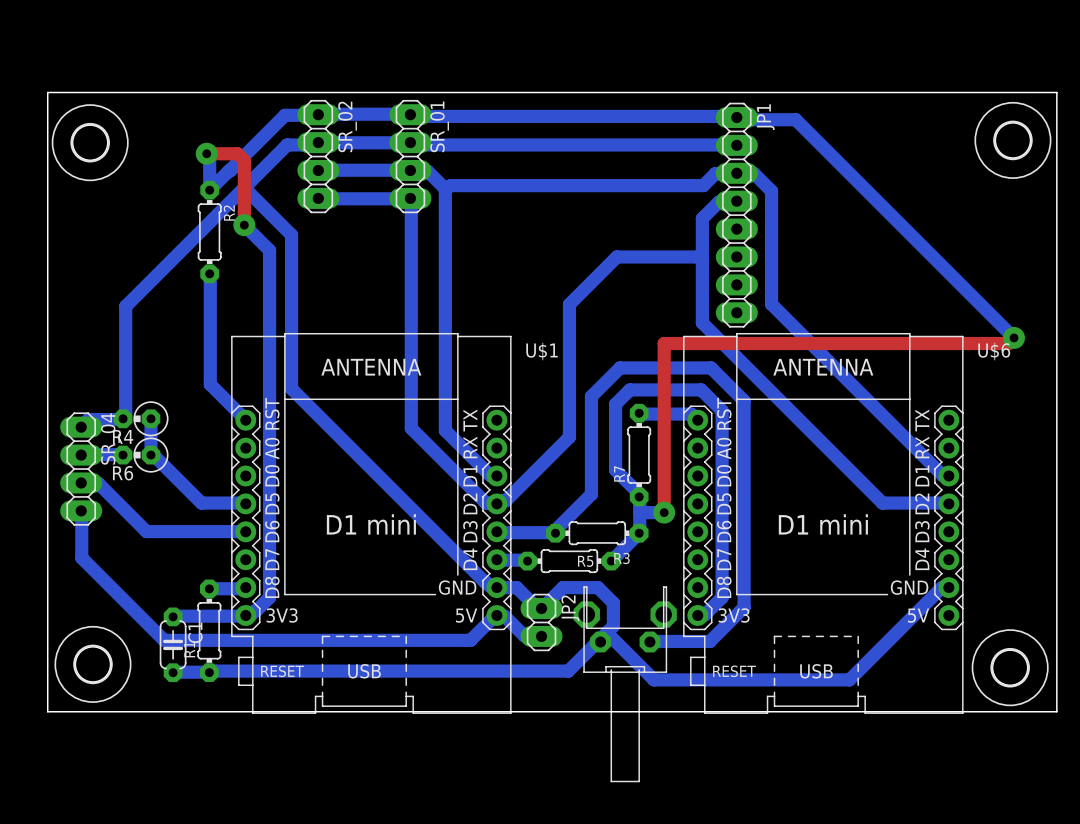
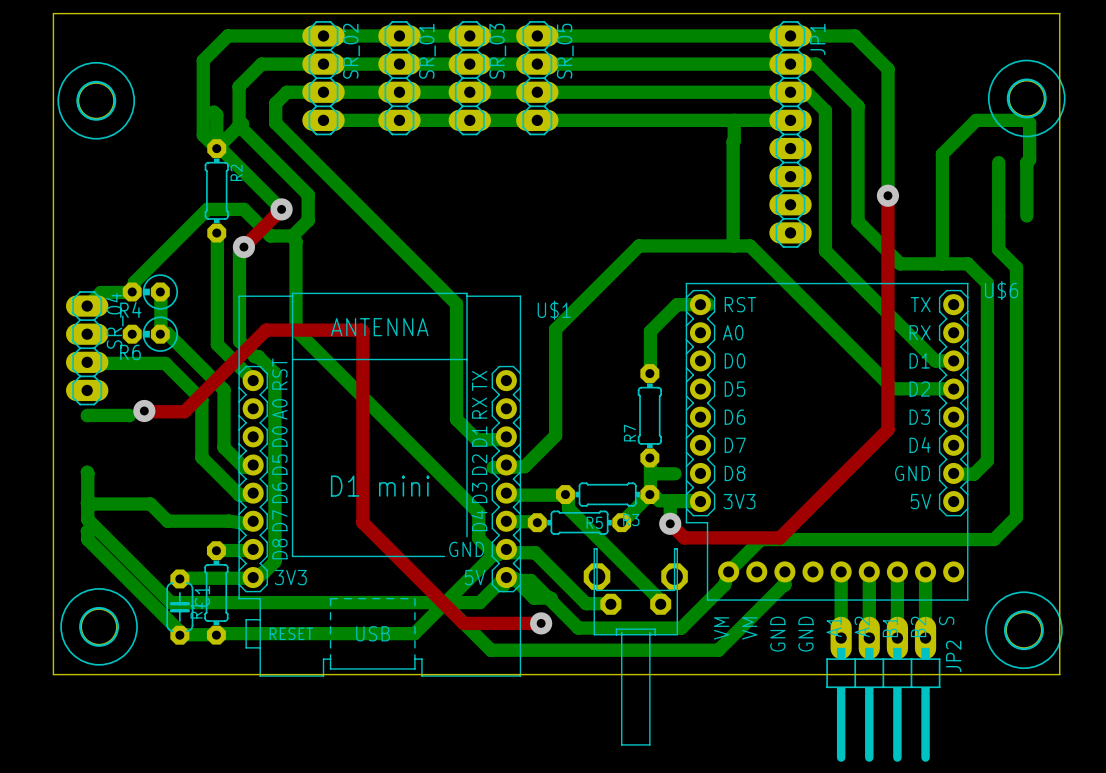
board edge: (47, 92) (1056, 92) (1056, 711) (1045, 711) -> (53, 50) (53, 13) (1059, 13) (1059, 674)
SR_03: none -> (469, 78)
SR_05: none -> (537, 78)
bottom track: none -> (790, 92) (807, 93) (825, 110) (825, 250) (935, 360) (953, 360)
bottom track: none -> (790, 92) (403, 92) (401, 89) (399, 92) (286, 92) (275, 103) (275, 123) (456, 304) (456, 419) (476, 439) (503, 438)
bottom track: (736, 145) (415, 144) (410, 142) (318, 142) (312, 144) (287, 144) (125, 306) (125, 412) (122, 419) (88, 419) (81, 427) -> none
top track: (203, 153) (237, 153) (244, 160) (244, 225) -> none
via: (206, 153) -> none
SR_02 position: (318, 156) -> (323, 78)
SR_01 position: (410, 156) -> (399, 78)
bottom track: none -> (323, 120) (790, 120) (773, 120)
bottom track: none -> (734, 120) (734, 245)
bottom track: (318, 170) (427, 171) (445, 188) -> none
bottom track: (228, 171) (284, 115) (736, 116) (743, 119) (795, 119) (1014, 337) -> none
bottom track: (244, 187) (291, 235) (291, 388) (484, 582) (490, 586) (496, 587) -> none
bottom track: (445, 188) (445, 430) (490, 475) (496, 476) -> none
bottom track: (445, 188) (450, 185) (703, 185) (715, 173) (753, 173) (771, 191) (771, 304) (942, 475) (948, 476) -> none
bottom track: (318, 198) (411, 198) (411, 428) (485, 503) (496, 503) (505, 500) (569, 437) (569, 304) (616, 256) (702, 256) -> none
bottom track: (736, 201) (718, 202) (702, 218) (702, 322) (882, 503) (948, 503) -> none
bottom track: none -> (998, 162) (998, 249) (1016, 267) (1016, 517) (994, 539) (760, 539) (728, 571) (724, 584) (681, 628) (578, 628) (530, 580) (503, 580) (503, 585)
JP1 position: (736, 215) -> (790, 134)
bottom track: (244, 225) (269, 250) (269, 597) (267, 599) -> (243, 247) (239, 251) (239, 341) (274, 373) (274, 561)
via: (244, 225) -> none
bottom track: none -> (888, 195) (888, 69) (854, 35) (227, 35) (203, 60) (203, 135) (216, 148) (222, 150) (281, 209)
top track: none -> (887, 195) (887, 429) (779, 537) (684, 537) (670, 523)
via: none -> (887, 195)
top track: none -> (281, 209) (243, 247)
via: none -> (281, 209)
bottom track: none -> (1026, 216) (1026, 162) (1029, 159) (1029, 123) (1026, 120) (976, 120) (942, 154) (942, 263)
bottom track: none -> (292, 235) (270, 235) (243, 209) (207, 209) (134, 282) (132, 292) (101, 292) (87, 306)
bottom track: none -> (292, 235) (308, 220) (308, 194) (239, 126) (239, 86) (261, 64) (815, 64) (858, 106) (858, 221) (900, 263) (967, 263) (987, 283) (987, 460) (974, 474) (953, 473)
bottom track: none -> (292, 235) (295, 241) (295, 330) (478, 512) (478, 538) (493, 554)
via: none -> (243, 247)
bottom track: none -> (160, 291) (160, 334) (167, 333) (224, 389) (224, 447) (243, 467) (250, 467)
U$6 footprint: [683, 333, 964, 714] -> [685, 282, 969, 601]
top track: (1014, 337) (1008, 343) (664, 343) (664, 512) -> none
via: (1014, 337) -> none
U$6 name position: U$6 (994, 351) -> U$6 (1001, 290)
bottom track: (639, 413) (691, 414) (697, 420) -> (649, 373) (650, 331) (677, 304) (708, 304)
R4 position: (141, 418) -> (150, 291)
bottom track: (150, 418) (150, 455) (156, 458) (194, 496) -> (87, 362) (165, 363) (201, 399) (201, 457)
bottom track: none -> (953, 389) (892, 388) (750, 245) (639, 245) (555, 329) (555, 435) (524, 466) (493, 467)
top track: none -> (144, 410) (184, 411) (266, 330) (361, 330) (362, 522) (463, 623) (541, 623)
via: none -> (144, 410)
R6 position: (141, 455) -> (150, 334)
SR_04 position: (81, 469) -> (87, 348)
bottom track: (81, 482) (98, 483) (146, 531) (245, 531) -> none
bottom track: (639, 496) (636, 490) (615, 470) (615, 404) (629, 389) (701, 389) (722, 410) (722, 597) (704, 615) (697, 615) -> none
bottom track: (201, 503) (245, 503) -> (208, 464) (239, 495) (250, 495)
via position: (664, 512) -> (670, 523)
bottom track: (496, 531) (555, 533) (558, 527) (591, 494) (591, 396) (619, 367) (711, 367) (744, 400) (744, 607) (710, 641) (649, 642) -> (503, 495) (565, 494) (568, 500) (568, 508) (660, 600) (660, 604)
bottom track: none -> (649, 494) (659, 500) (700, 501) (670, 501) (670, 523)
bottom track: none -> (87, 502) (150, 504) (167, 521) (229, 521) (250, 524)
bottom track: none -> (87, 531) (87, 539) (177, 629) (179, 635)
bottom track: (496, 587) (516, 587) (535, 606) (541, 608) (562, 587) (598, 587) (613, 603) (613, 626) (601, 638) (601, 641) (594, 644) (568, 671) (405, 671) -> (493, 554) (414, 633)
bottom track: (948, 587) (941, 587) (849, 679) (654, 679) (606, 632) -> none
bottom track: none -> (493, 554) (503, 552) (535, 552) (586, 603) (610, 604)
JP2 footprint: [520, 593, 563, 652] -> [826, 616, 941, 762]
JP2 name position: JP2 (570, 608) -> JP2 (953, 656)
bottom track: none -> (785, 571) (784, 584) (718, 650) (490, 650) (444, 603)
bottom track: none -> (841, 571) (841, 638)
bottom track: none -> (869, 571) (869, 638)
bottom track: none -> (897, 571) (897, 638)
bottom track: none -> (926, 572) (925, 571) (925, 638)
via: none -> (541, 623)

